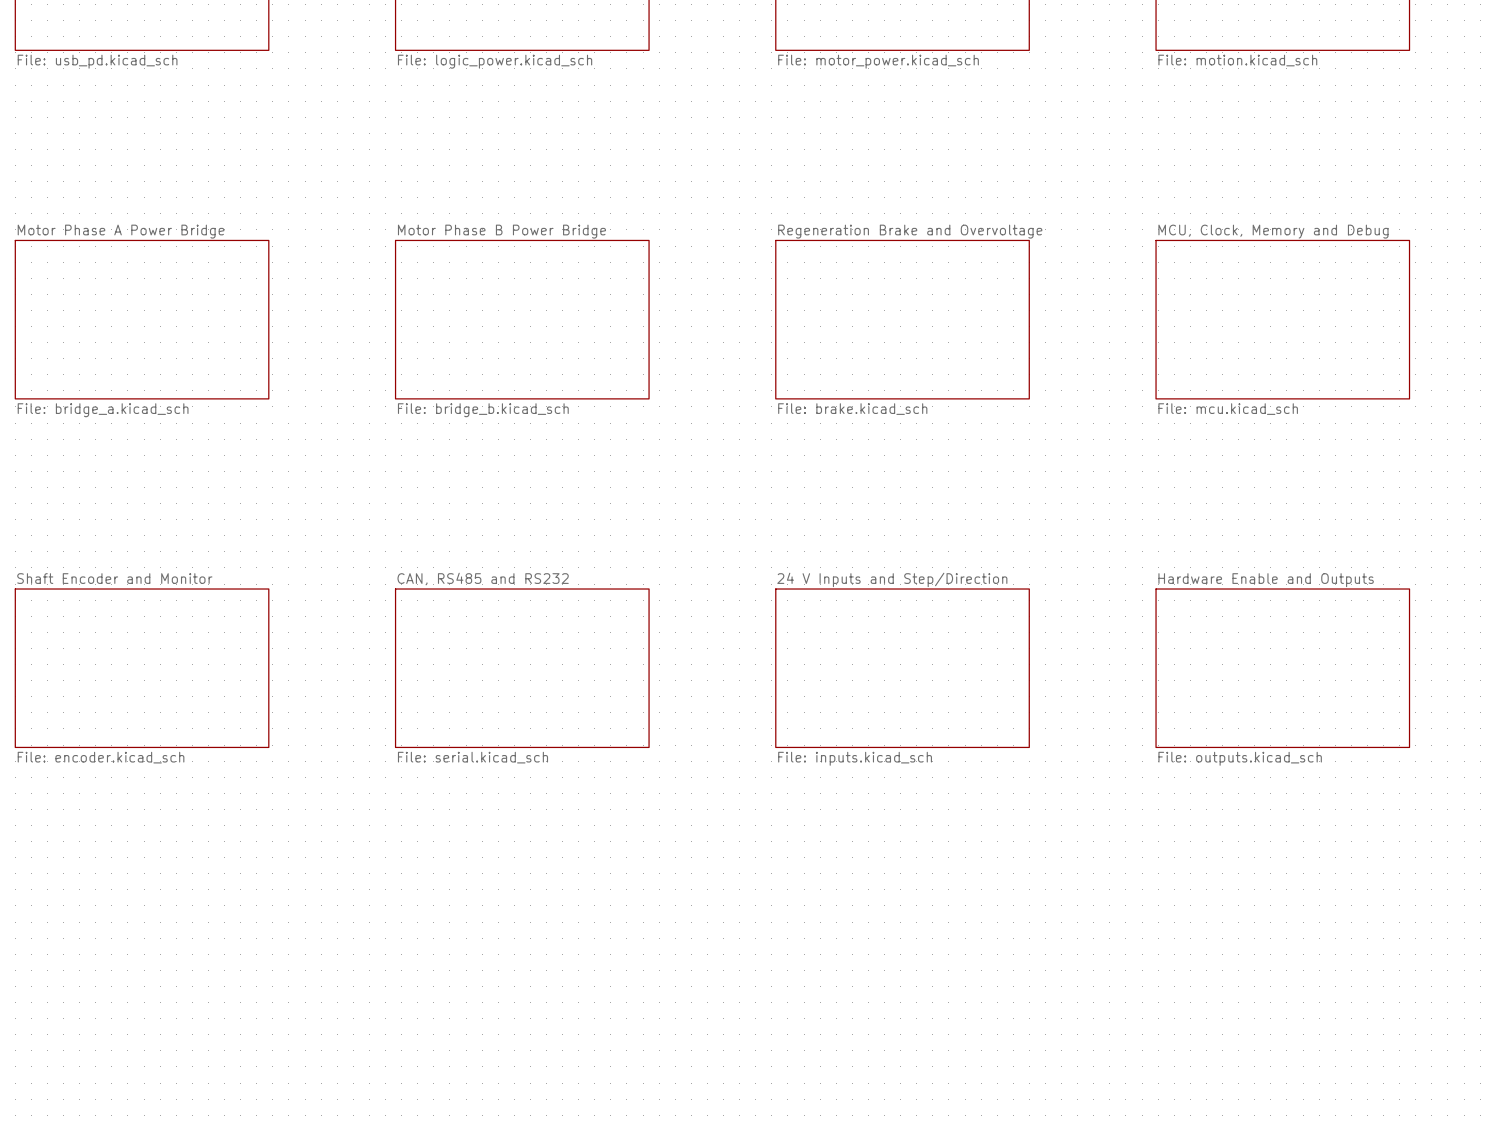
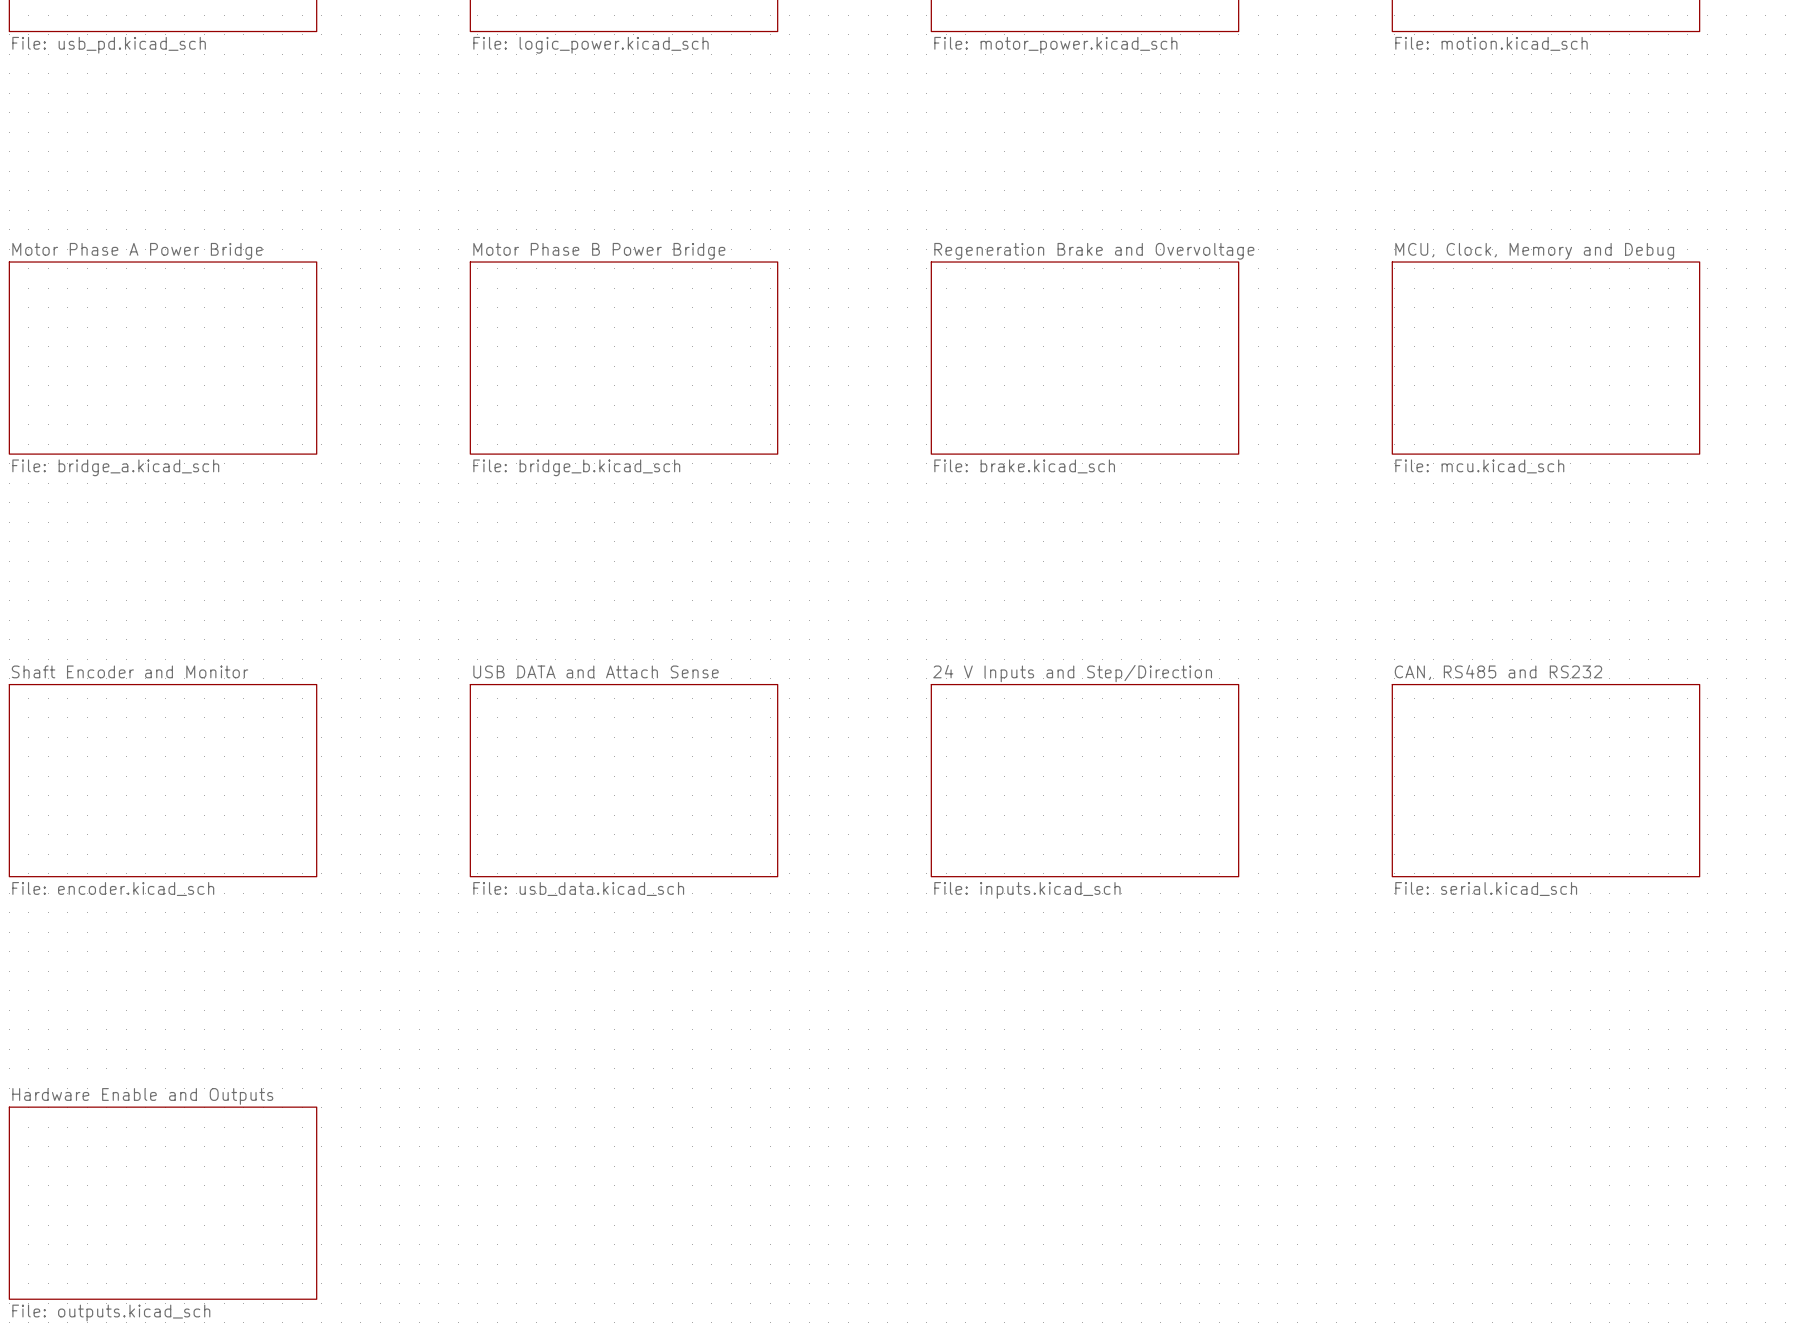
sheet CAN, RS485 and RS232 name: CAN, RS485 and RS232 (483, 579) -> USB DATA and Attach Sense (596, 671)
sheet Hardware Enable and Outputs name: Hardware Enable and Outputs (1266, 580) -> CAN, RS485 and RS232 (1498, 672)
sheet CAN, RS485 and RS232 value: File: serial.kicad_sch (472, 757) -> File: usb_data.kicad_sch (578, 889)
sheet Hardware Enable and Outputs value: File: outputs.kicad_sch (1240, 758) -> File: serial.kicad_sch (1486, 889)
sheet Hardware Enable and Outputs: none -> File: outputs.kicad_sch (163, 1203)

